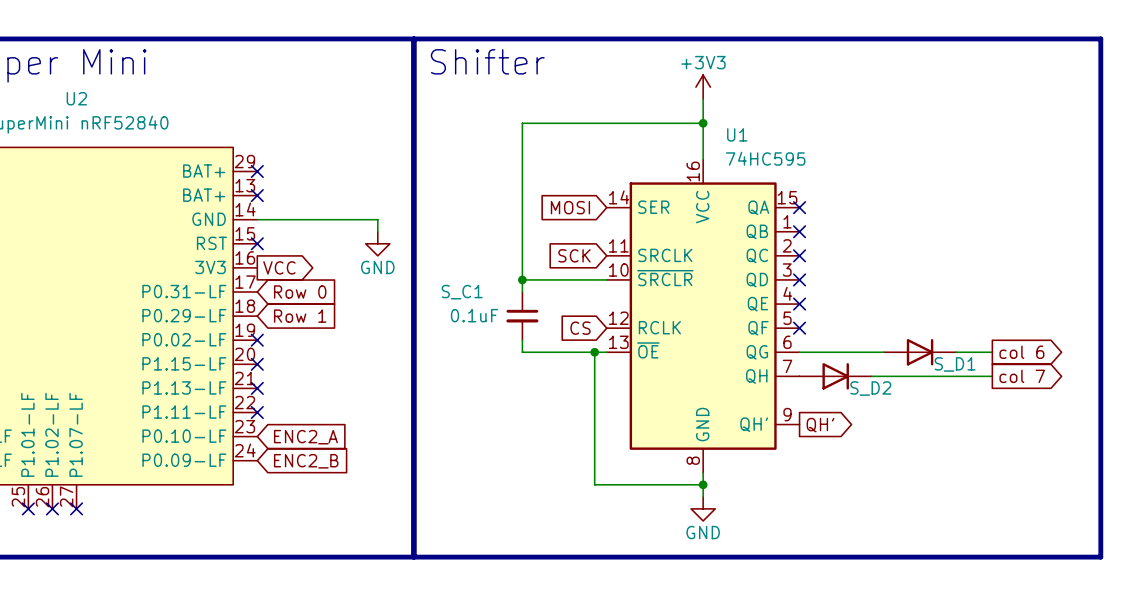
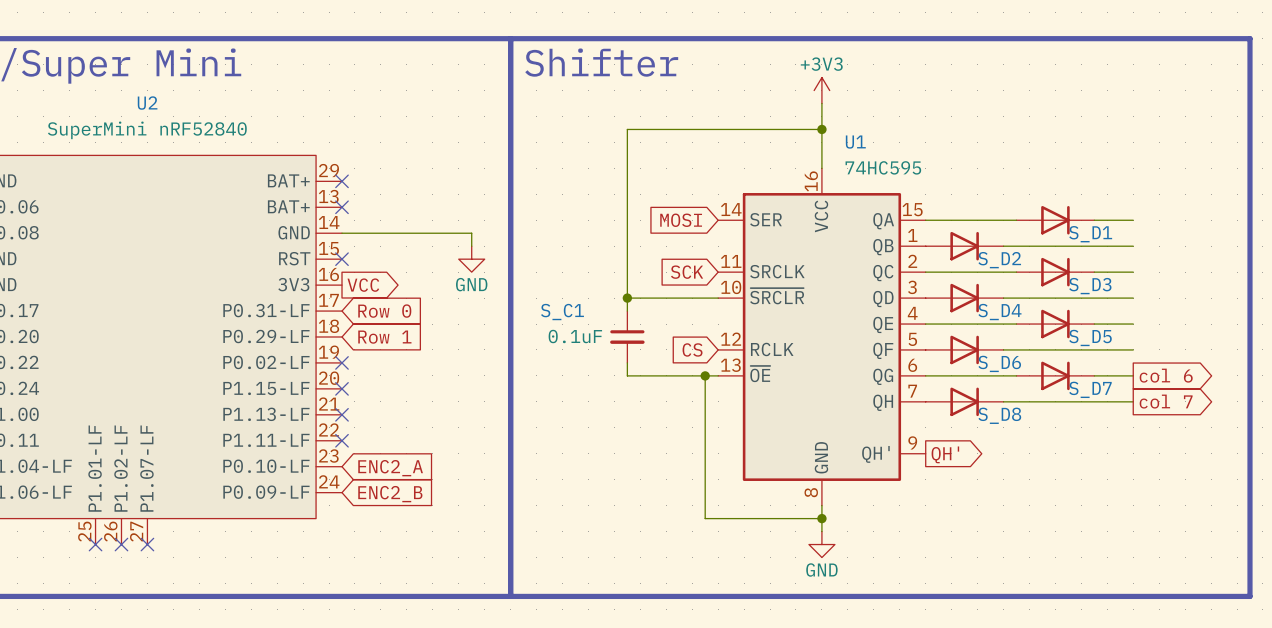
wire: none -> (925, 220) (1016, 220)
no-connect mark: (799, 207) -> none
S_D1: none -> (1055, 220)
wire: none -> (1094, 220) (1133, 220)
no-connect mark: (799, 231) -> none
S_D2: none -> (964, 246)
wire: none -> (1003, 246) (1133, 246)
wire: none -> (925, 272) (1016, 272)
no-connect mark: (799, 255) -> none
S_D3: none -> (1055, 272)
wire: none -> (1094, 272) (1133, 272)
no-connect mark: (799, 279) -> none
S_D4: none -> (964, 298)
wire: none -> (1003, 298) (1133, 298)
wire: none -> (925, 324) (1016, 324)
no-connect mark: (799, 304) -> none
S_D5: none -> (1055, 324)
wire: none -> (1094, 324) (1133, 324)
no-connect mark: (799, 328) -> none
S_D6: none -> (964, 349)
wire: none -> (1003, 349) (1133, 349)
S_D1 name: S_D1 (955, 364) -> S_D7 (1090, 389)
S_D2 name: S_D2 (870, 388) -> S_D8 (999, 415)

